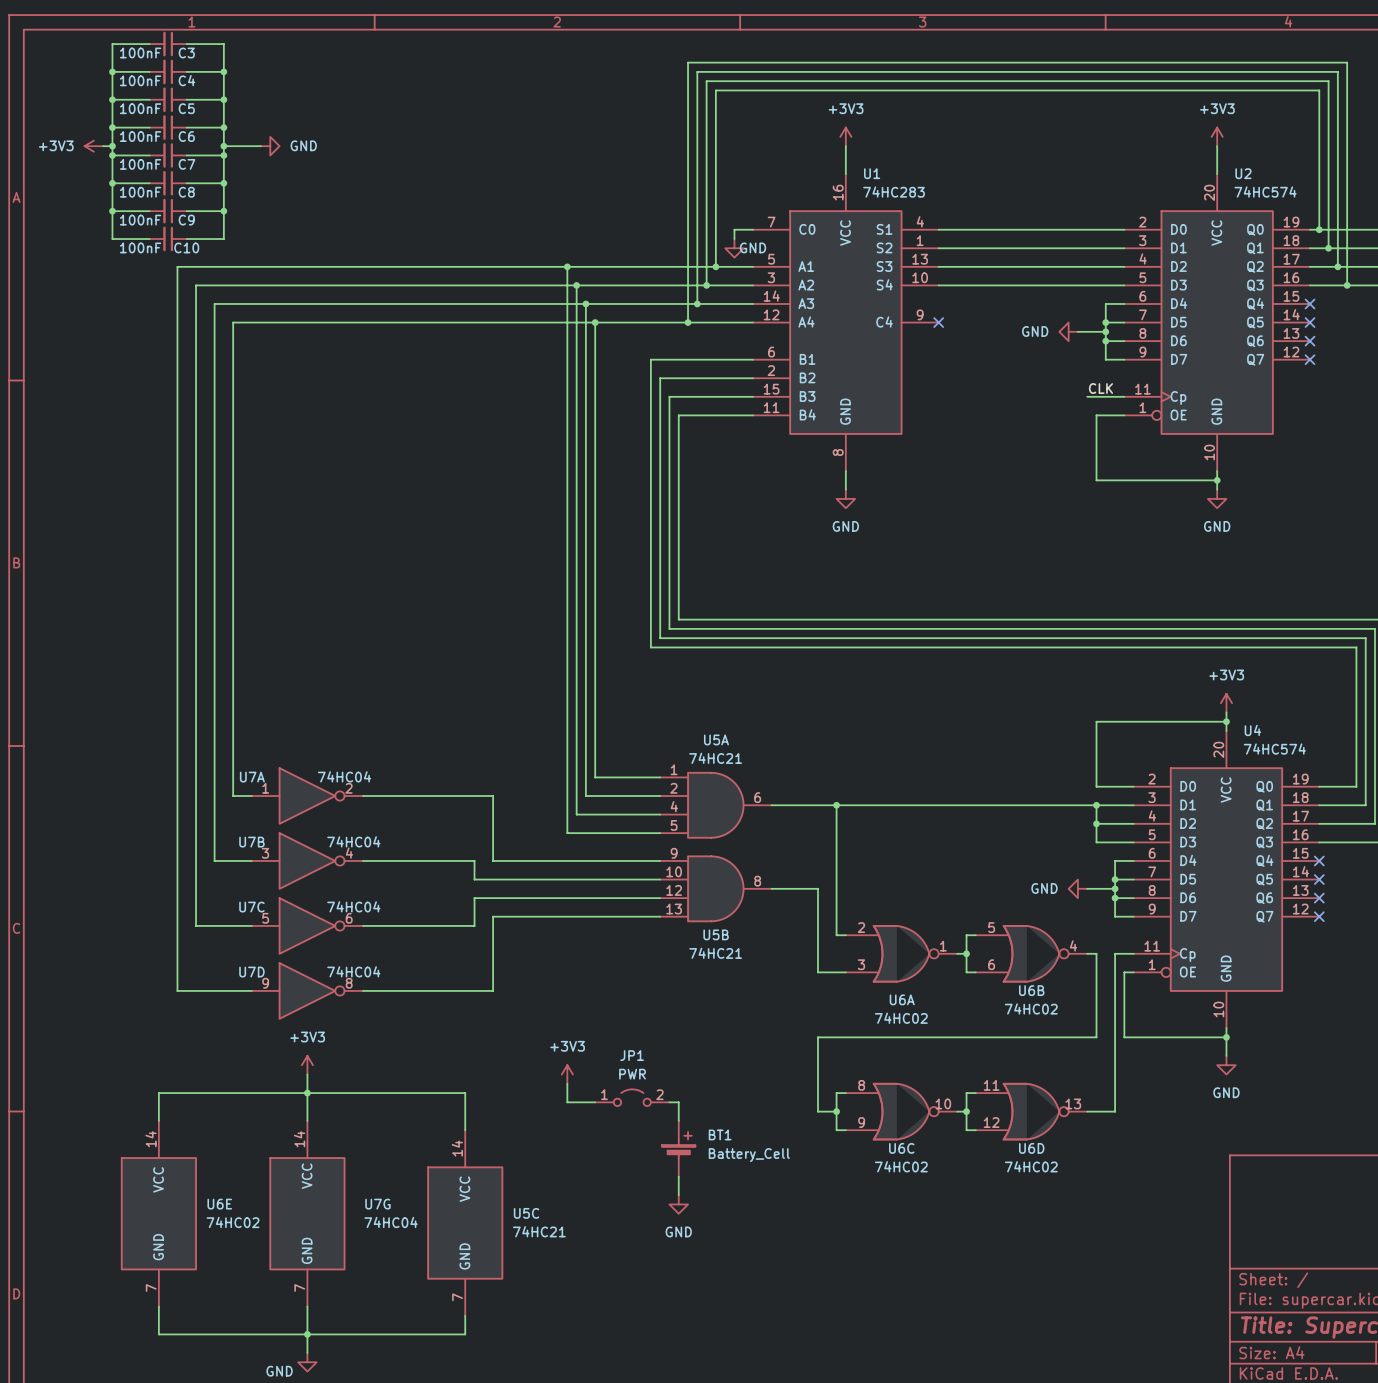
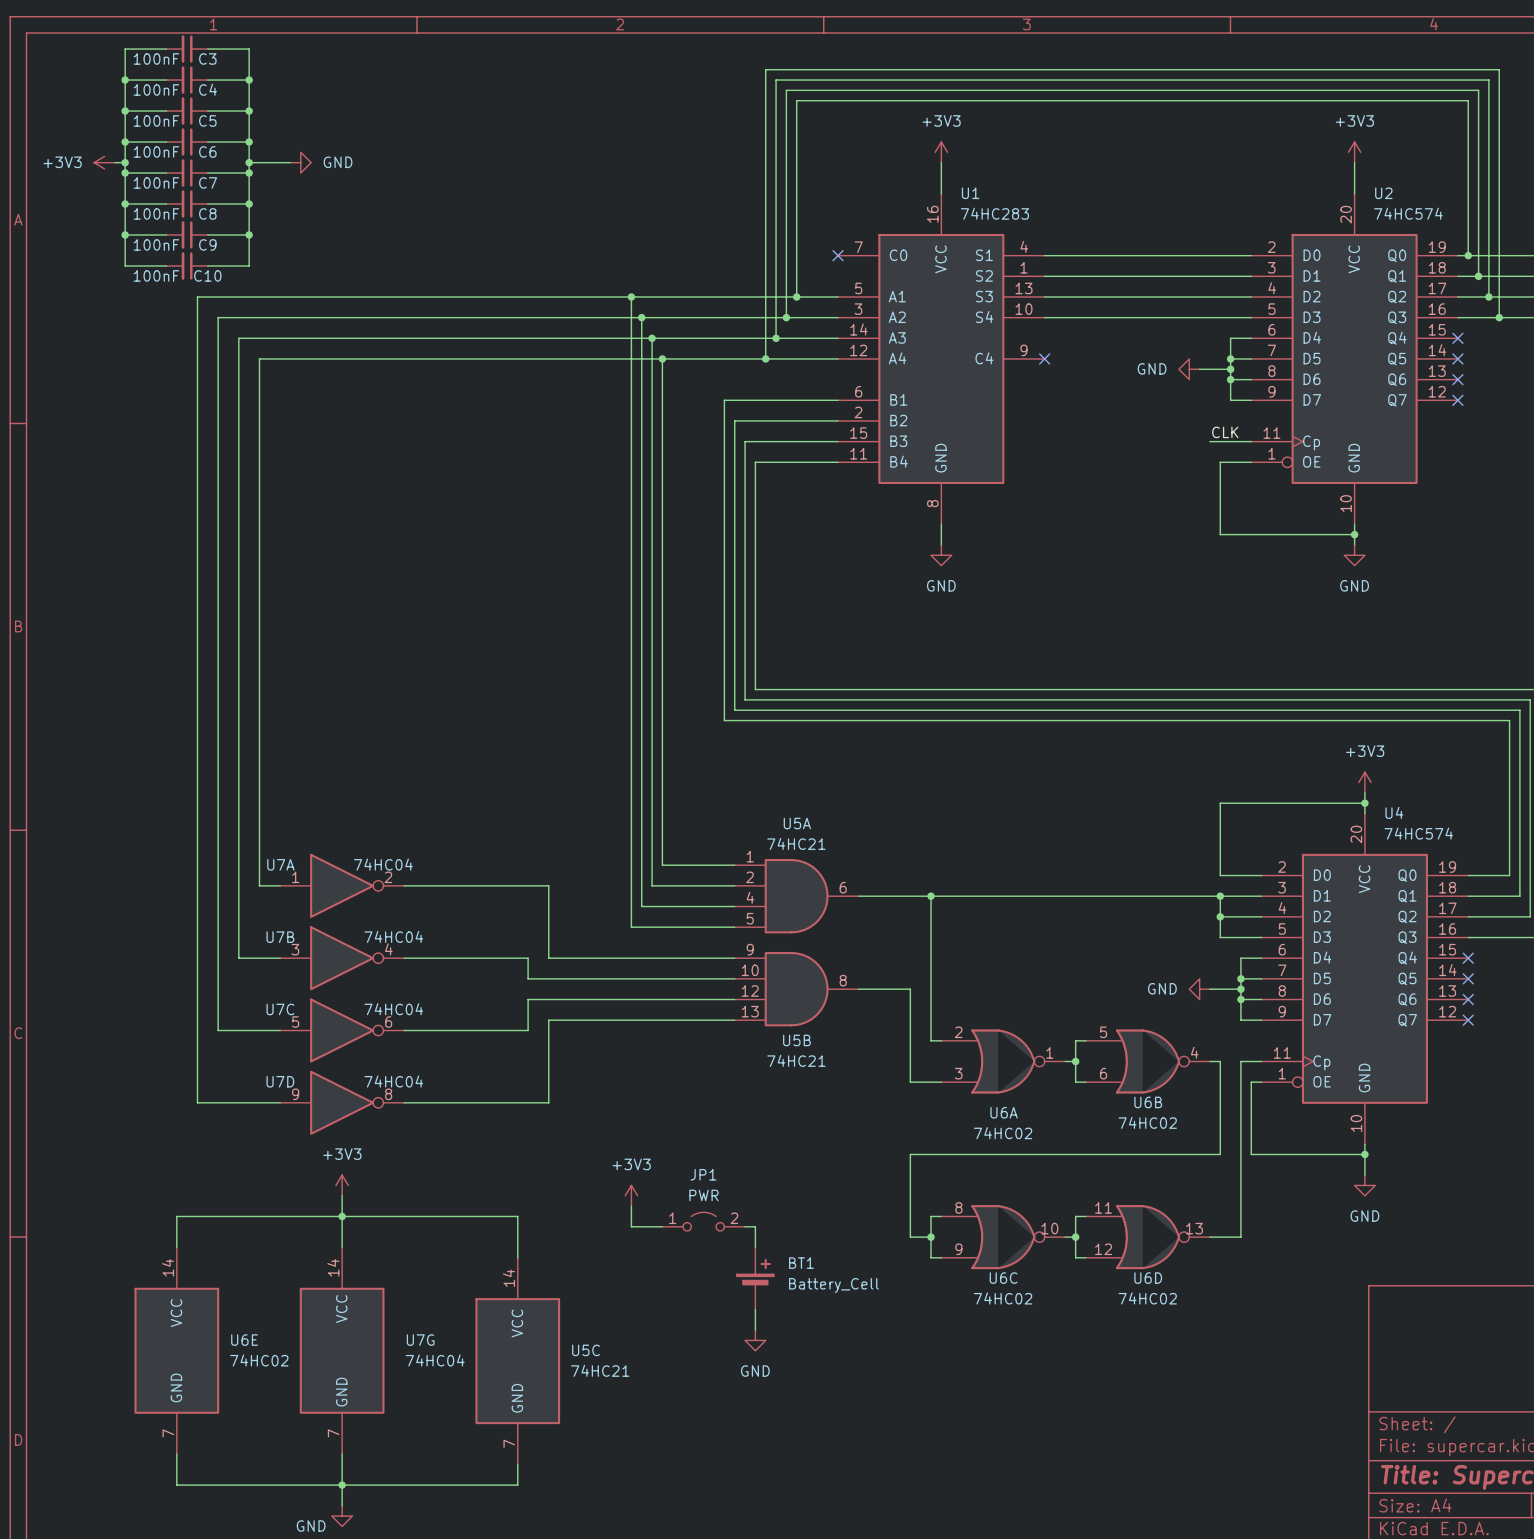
wire: (753, 229) (734, 229) (734, 239) -> none
no-connect mark: none -> (838, 255)
power symbol: GND (734, 248) -> none

